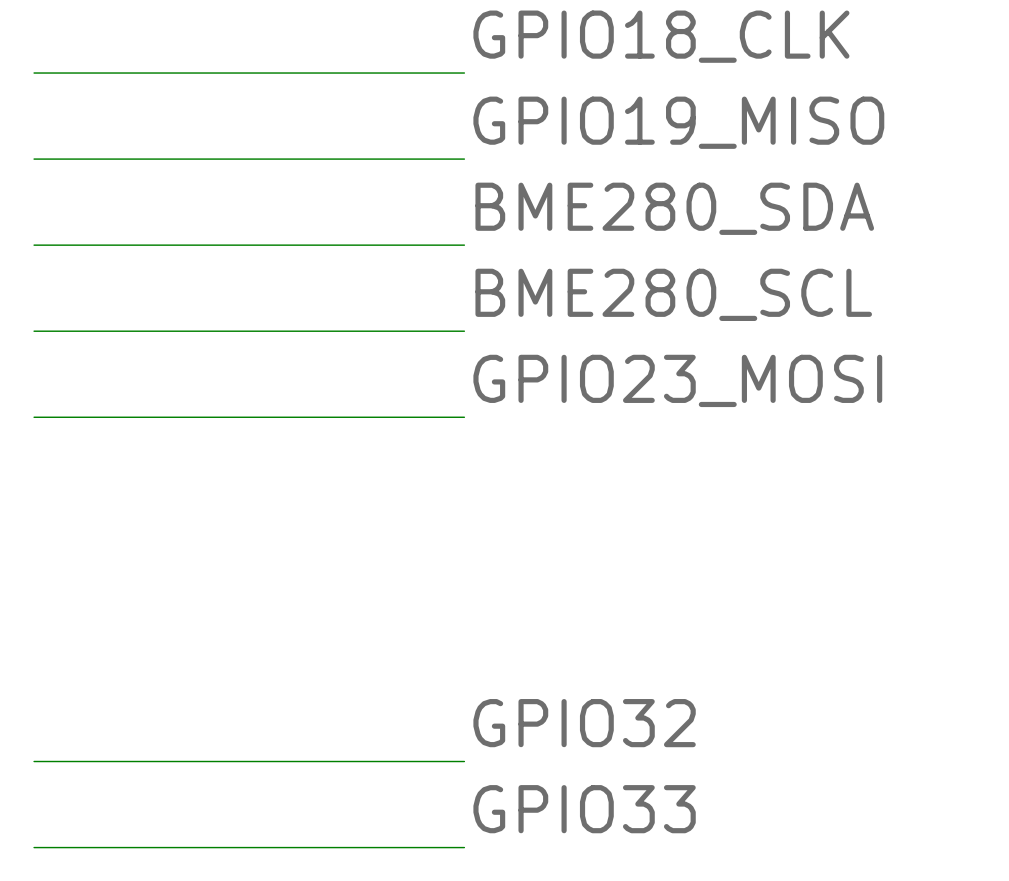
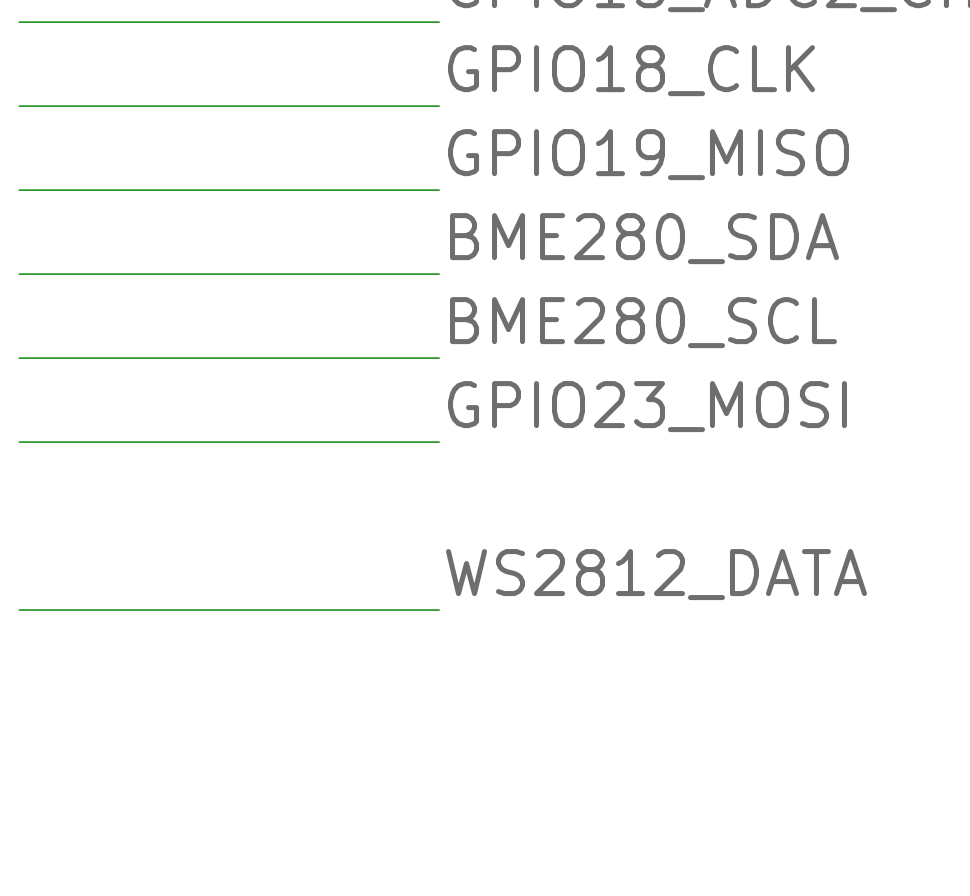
label: none -> WS2812_DATA (656, 574)
label: GPIO32 (584, 723) -> none
wire: (34, 761) (464, 761) -> (19, 610) (439, 610)
label: GPIO33 (584, 809) -> none
wire: (34, 847) (464, 847) -> none

